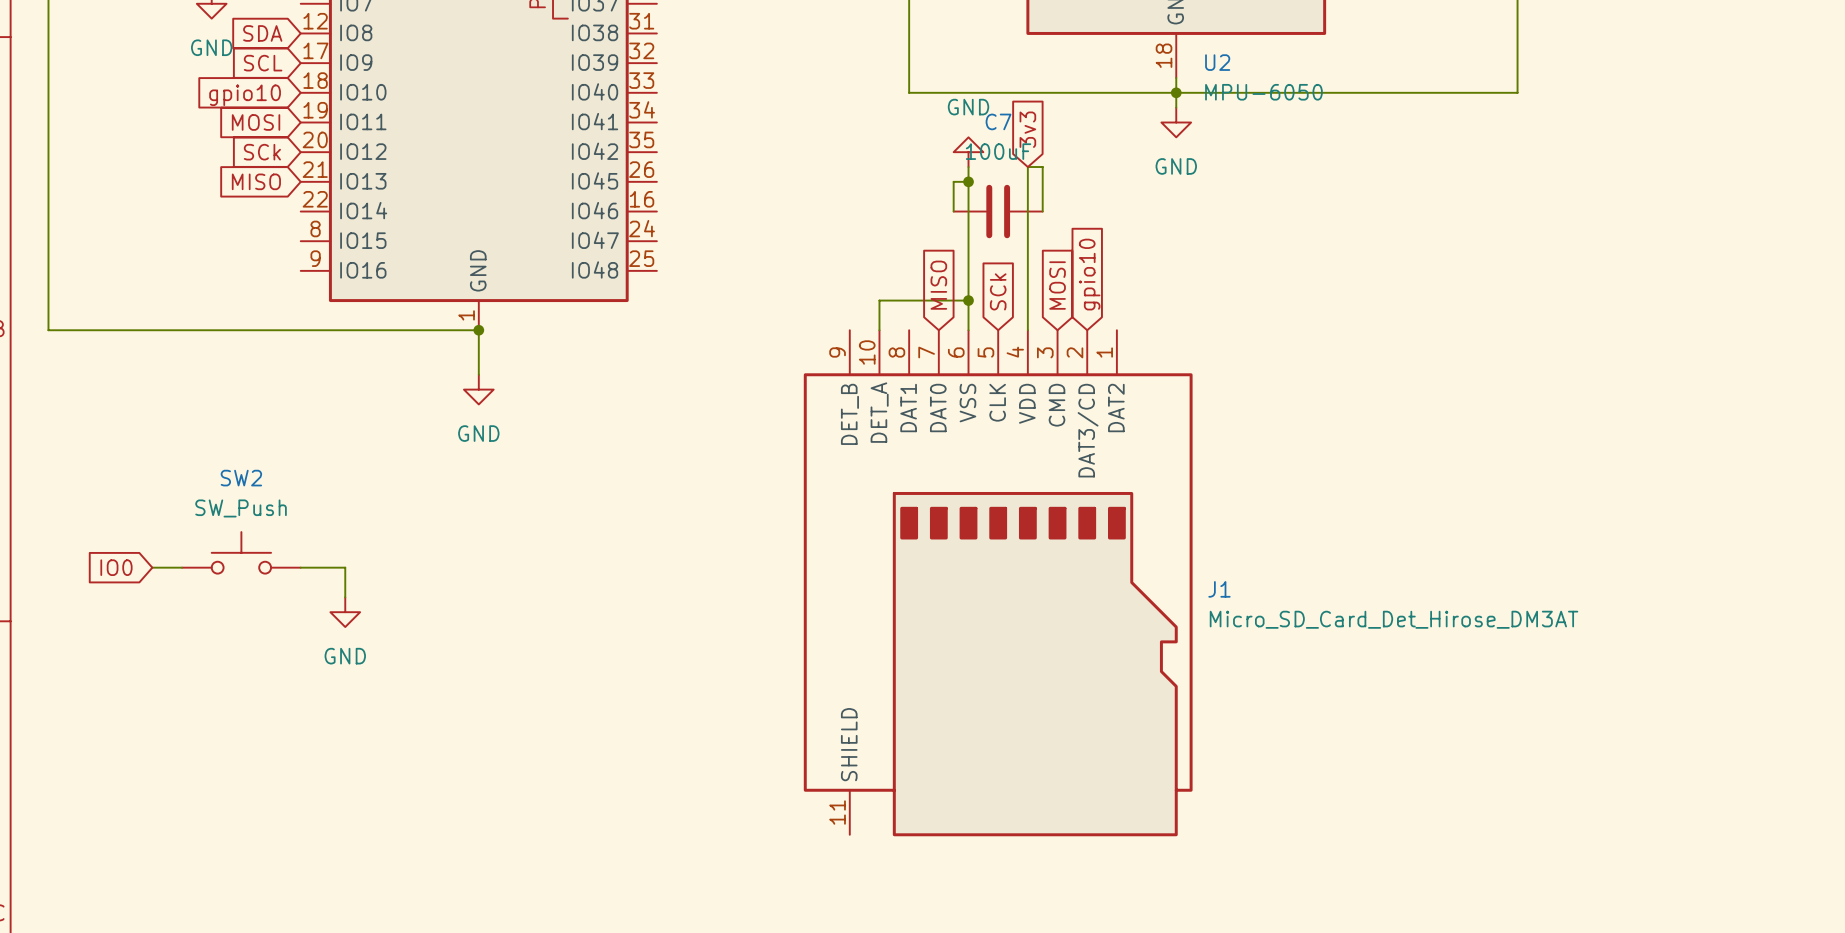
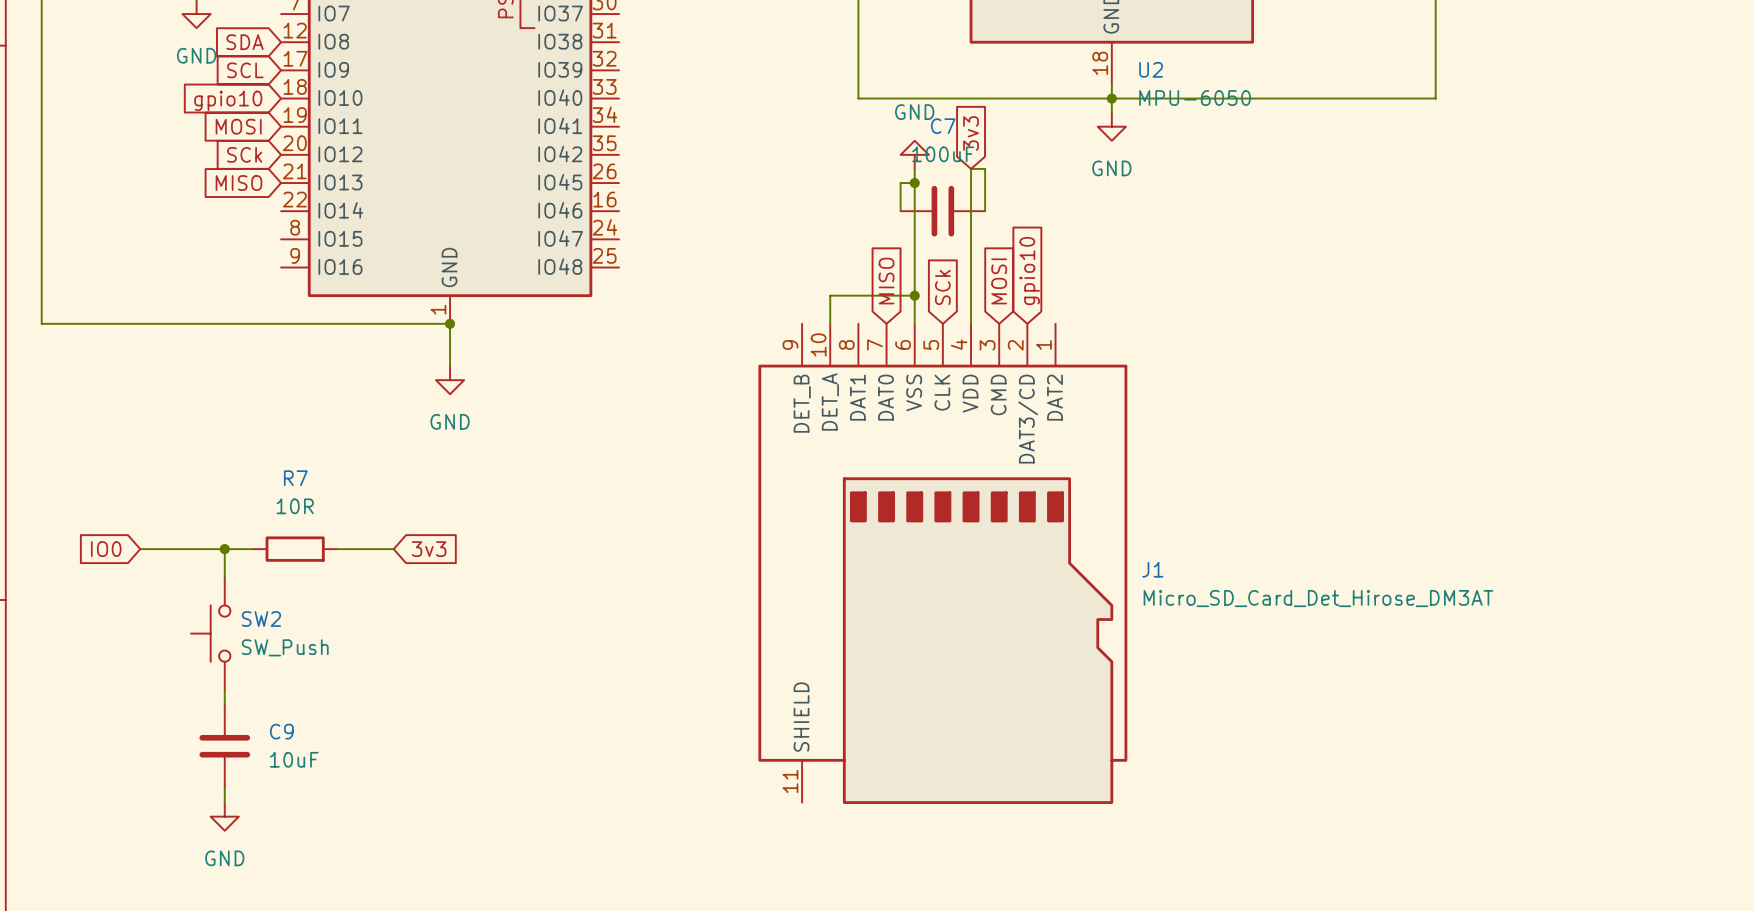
SW2 name position: SW2 (241, 478) -> SW2 (261, 618)
SW2 value position: SW_Push (241, 508) -> SW_Push (285, 647)
SW2 rotation: 0° (241, 552) -> 90° counterclockwise (210, 633)
SW2 position: (241, 552) -> (210, 633)
wire: none -> (168, 549) (252, 549)
wire: none -> (224, 549) (224, 577)
junction: none -> (224, 549)
wire: (300, 567) (345, 567) (345, 597) -> none
R7: none -> 10R (295, 549)
wire: none -> (337, 549) (393, 549)
global label: none -> 3v3 (429, 549)
power symbol position: GND (345, 612) -> GND (224, 816)
wire: none -> (224, 689) (224, 704)
C9: none -> 10uF (224, 746)
wire: none -> (224, 788) (224, 802)

